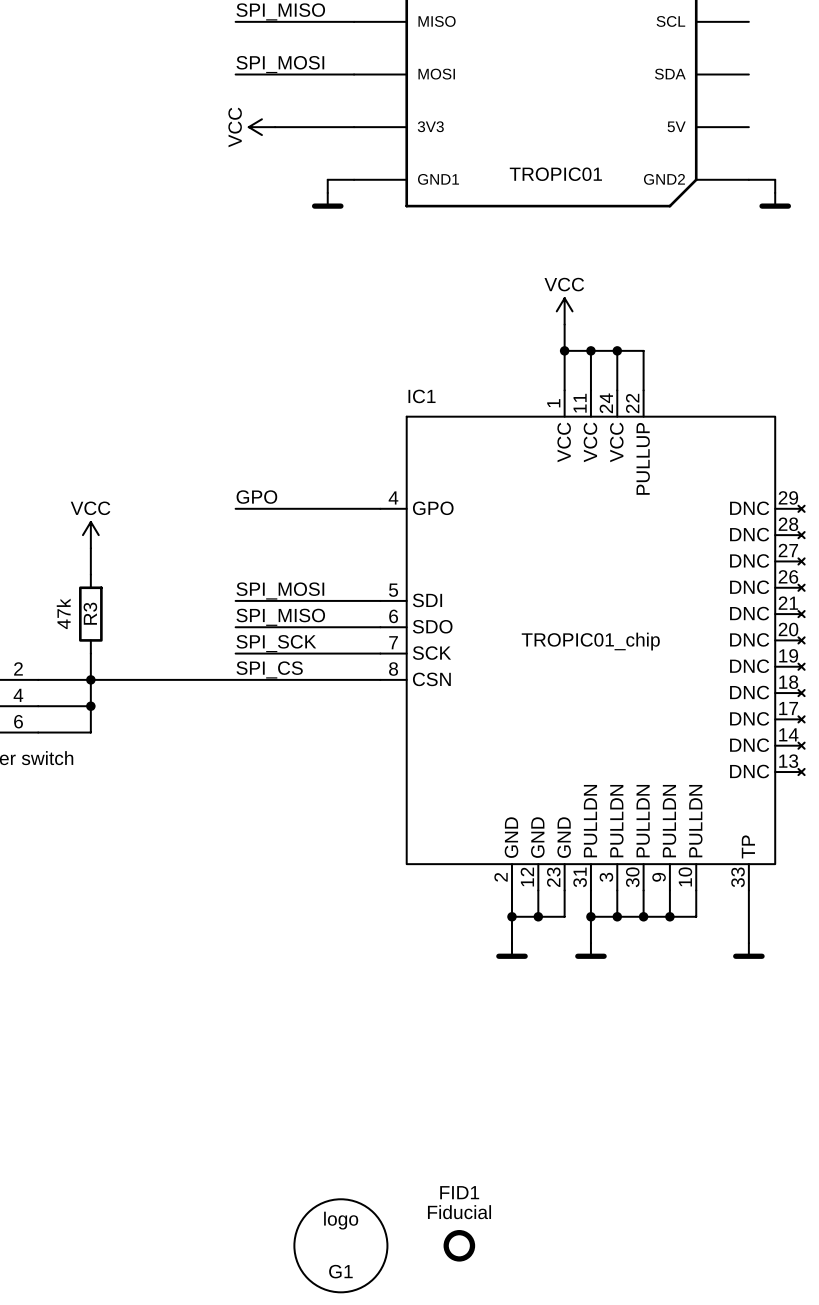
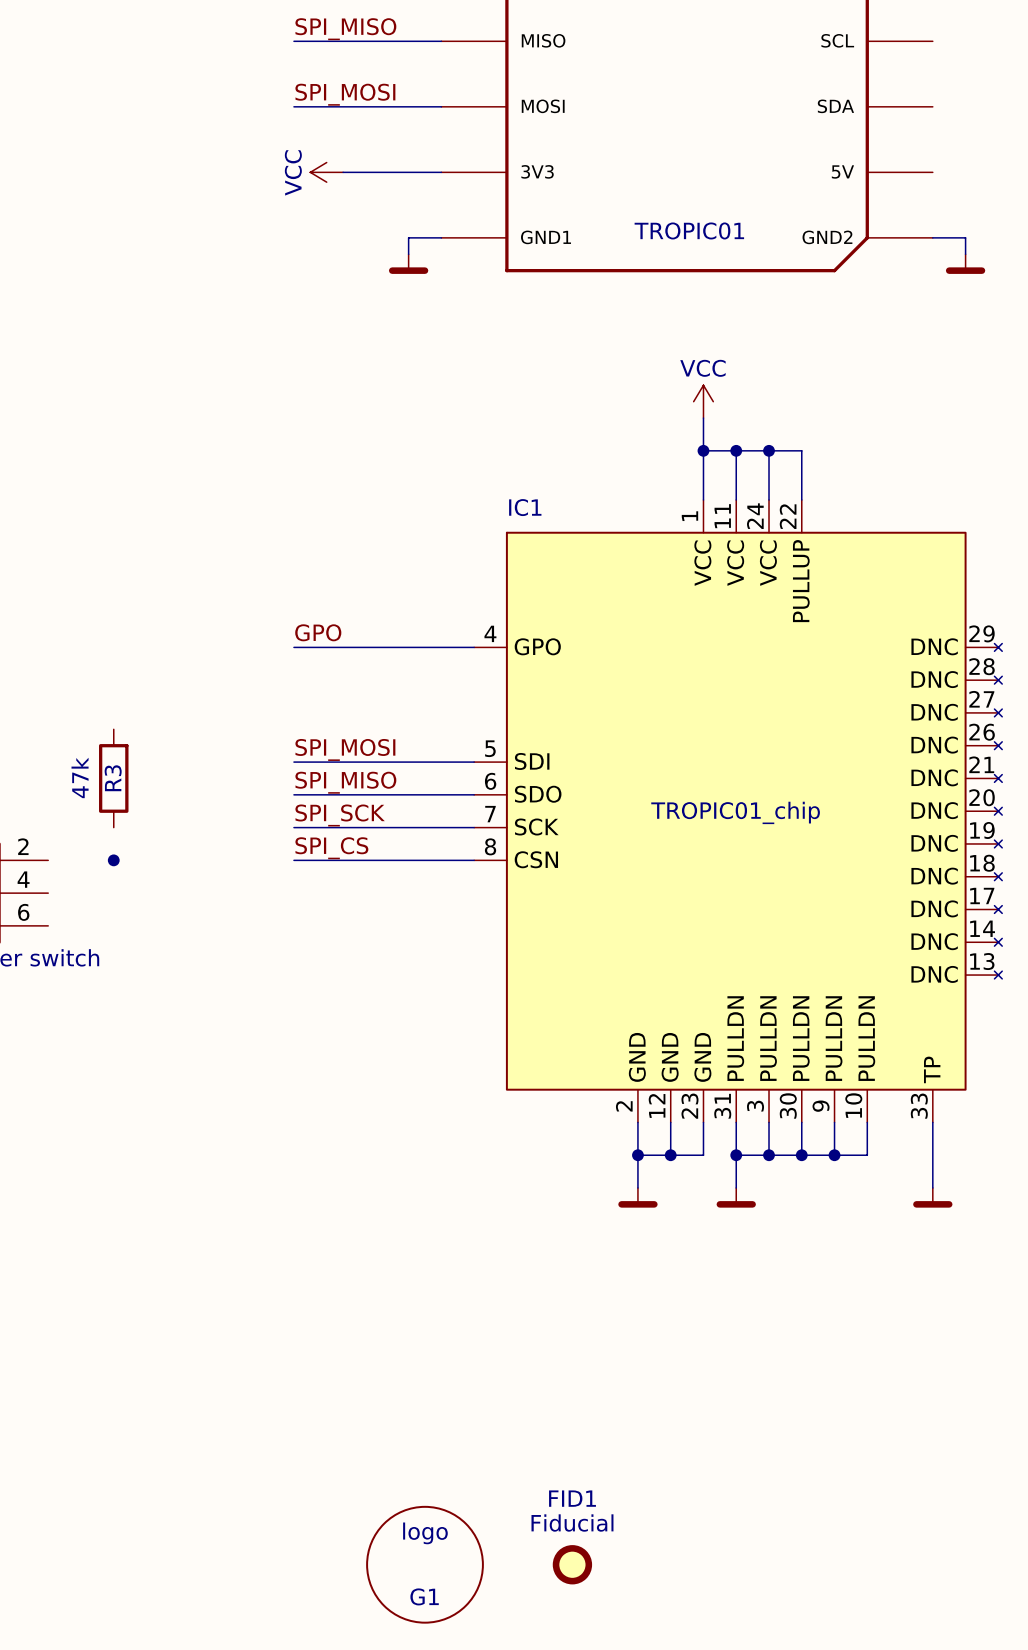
power symbol: VCC (90, 535) -> none
wire: (90, 548) (90, 574) -> none
wire: (90, 653) (90, 732) (38, 732) -> none
wire: (38, 679) (235, 679) -> none
wire: (38, 706) (90, 706) -> none
junction: (90, 706) -> none

